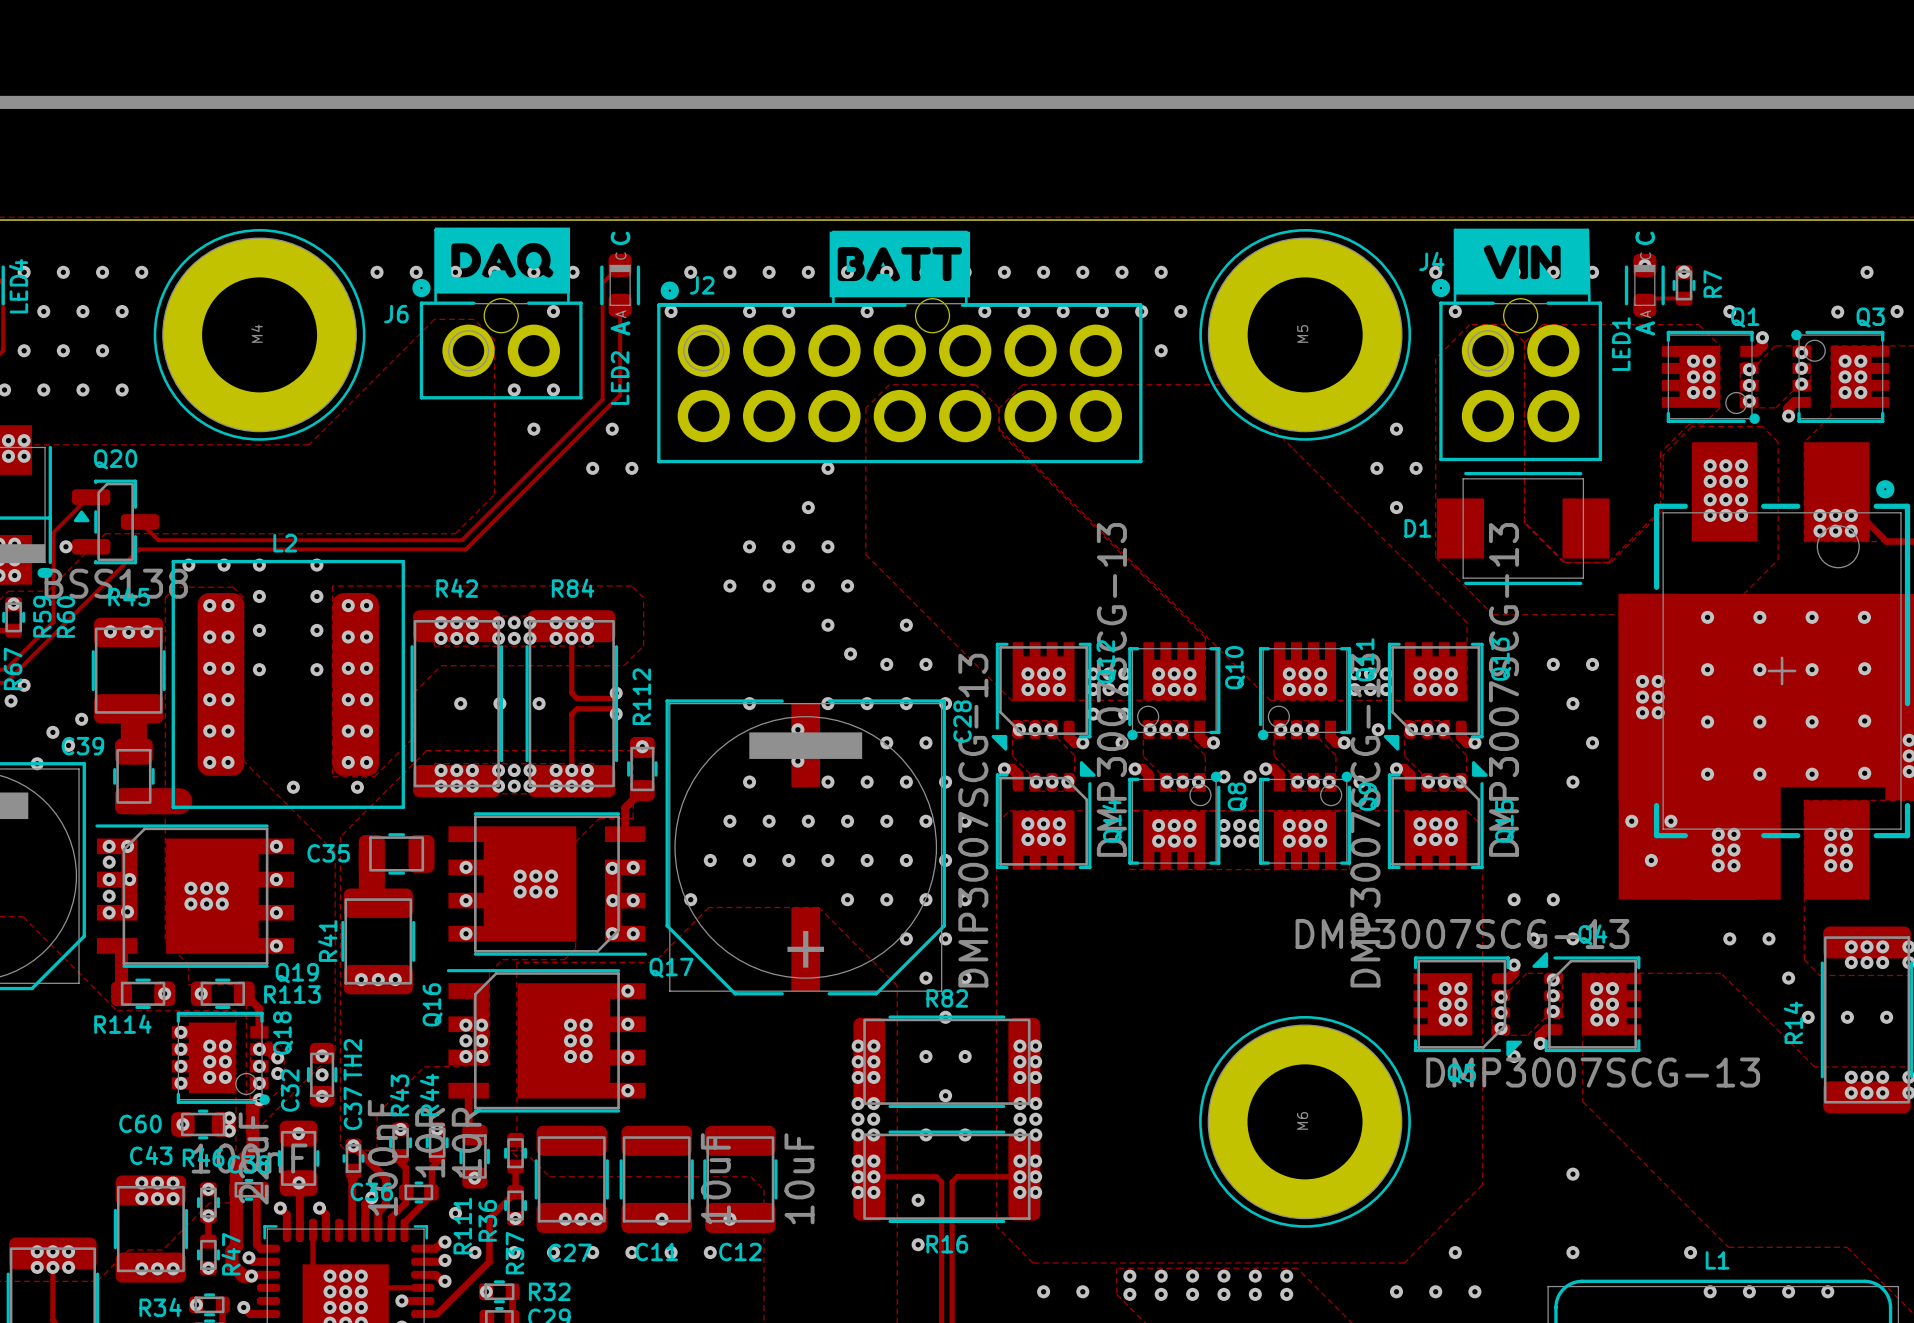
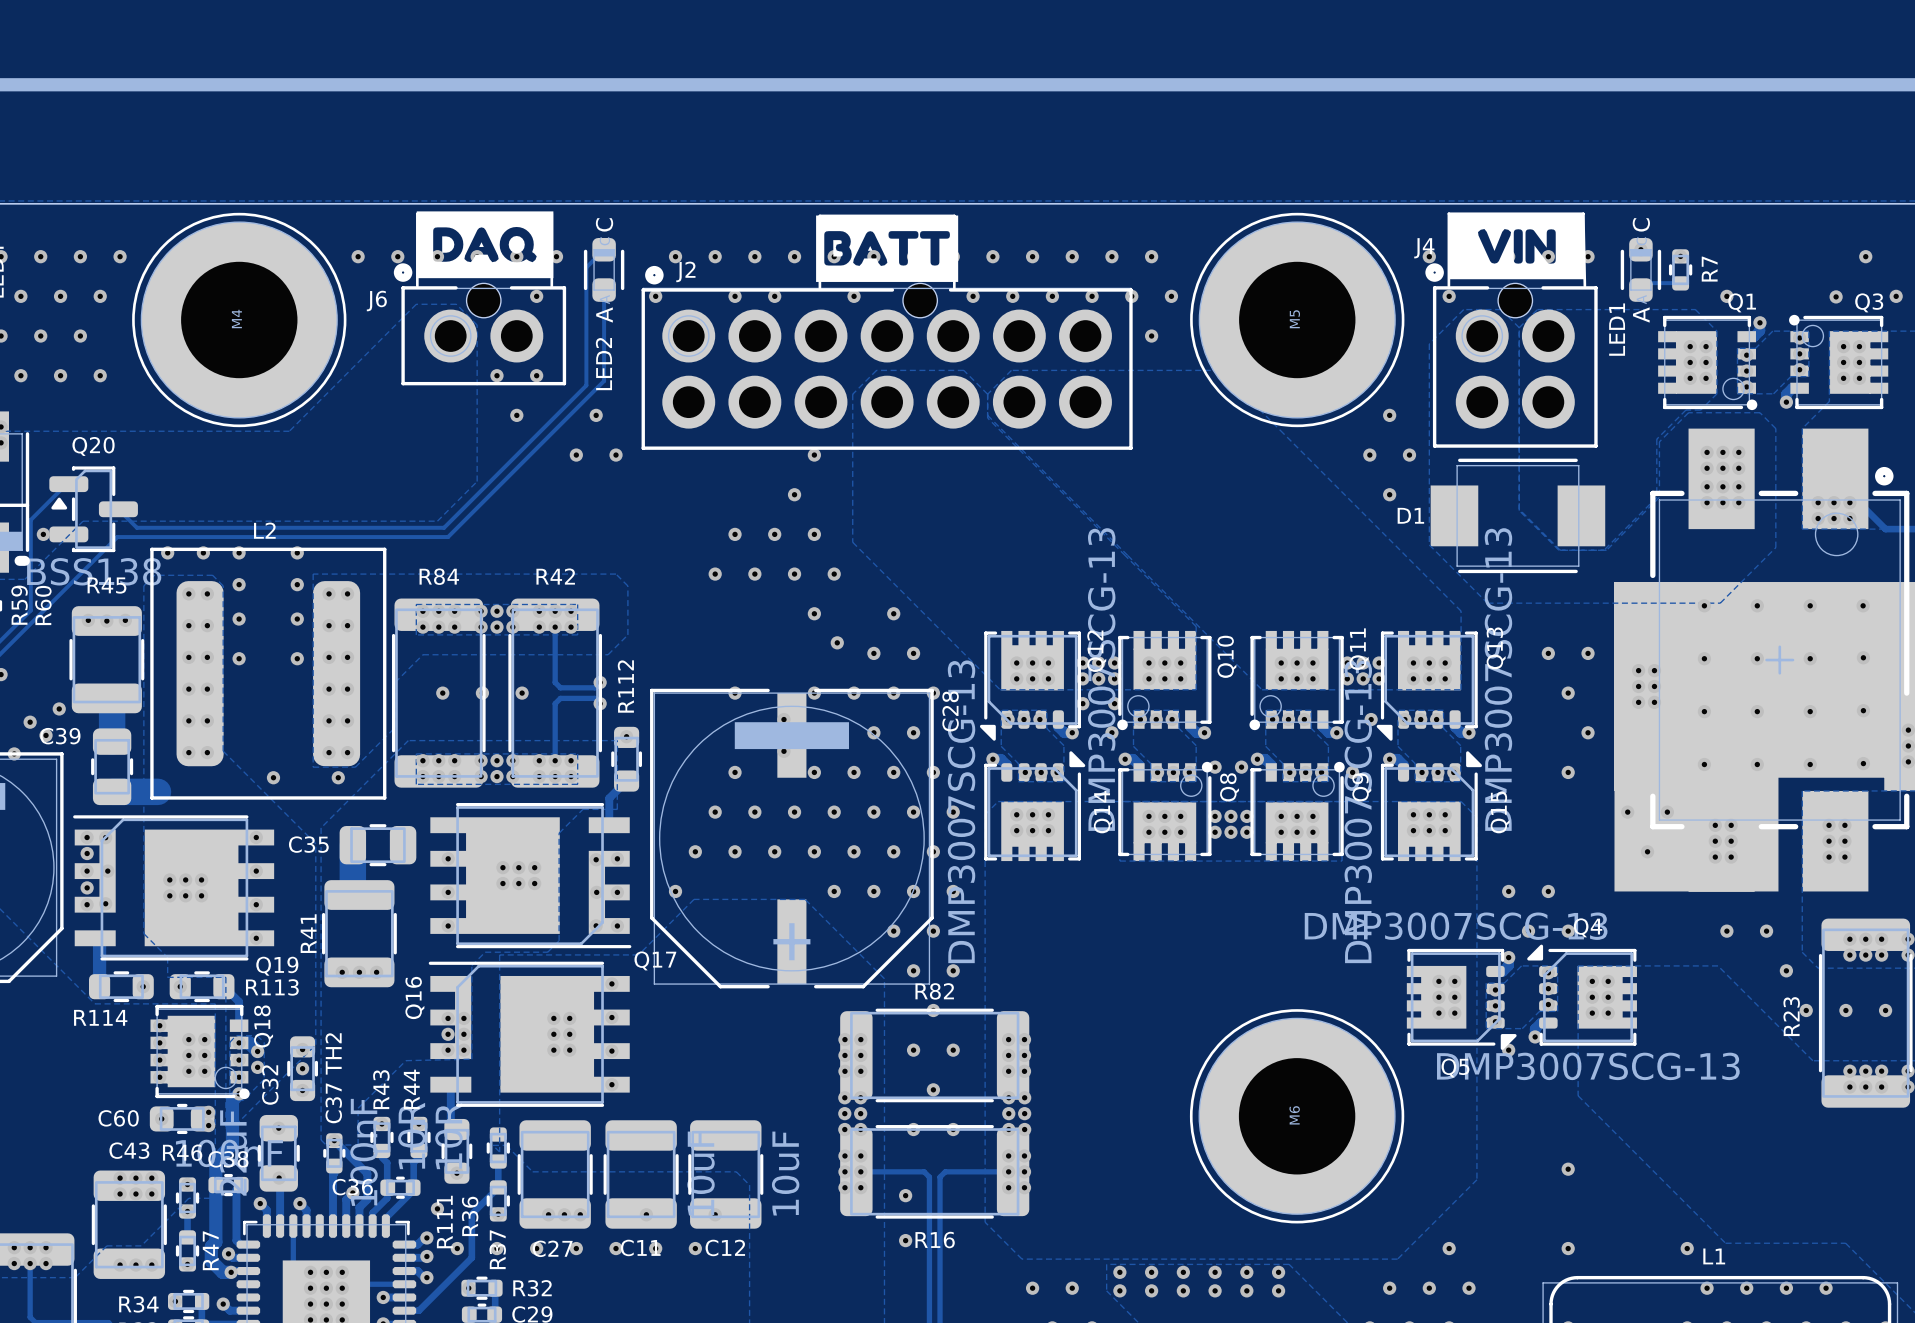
R42 name: R42 (457, 588) -> R84 (439, 576)
R84 name: R84 (573, 588) -> R42 (555, 576)
R14 name: R14 (1793, 1022) -> R23 (1791, 1016)

